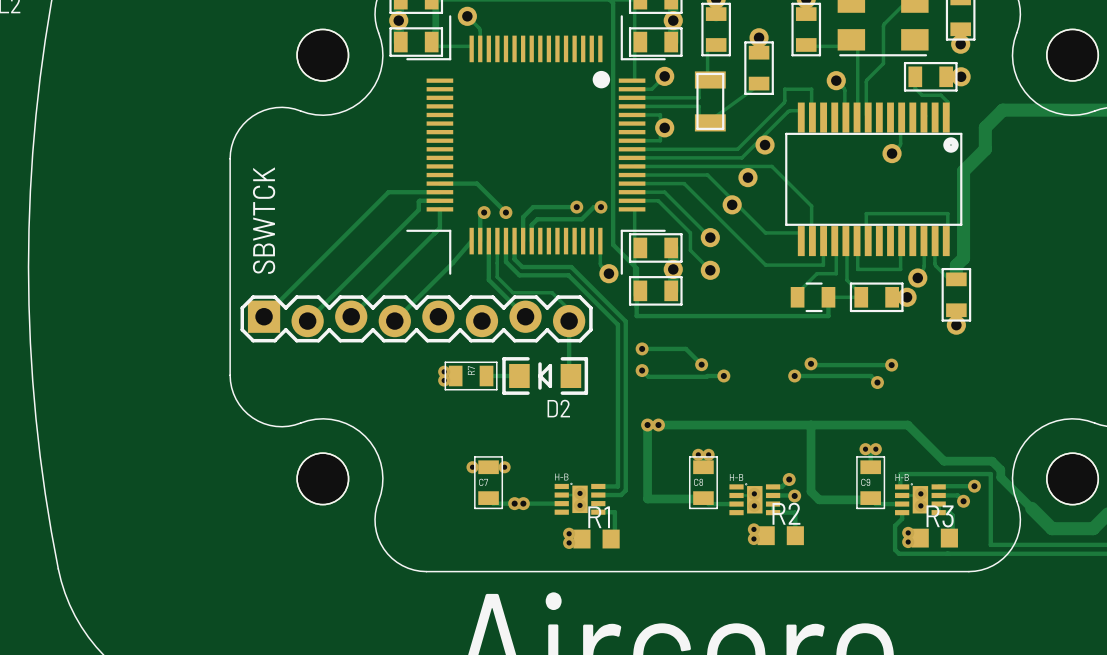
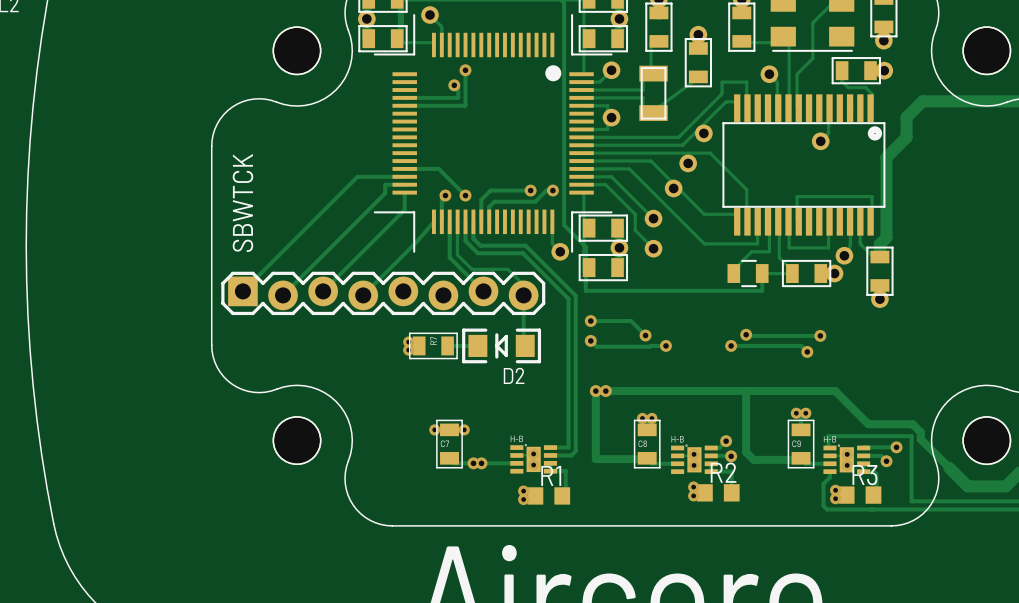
track: none -> (465, 70) (465, 105) (404, 105)
via: none -> (465, 70)
track: none -> (454, 85) (458, 89) (457, 97) (404, 97)
via: none -> (454, 85)

